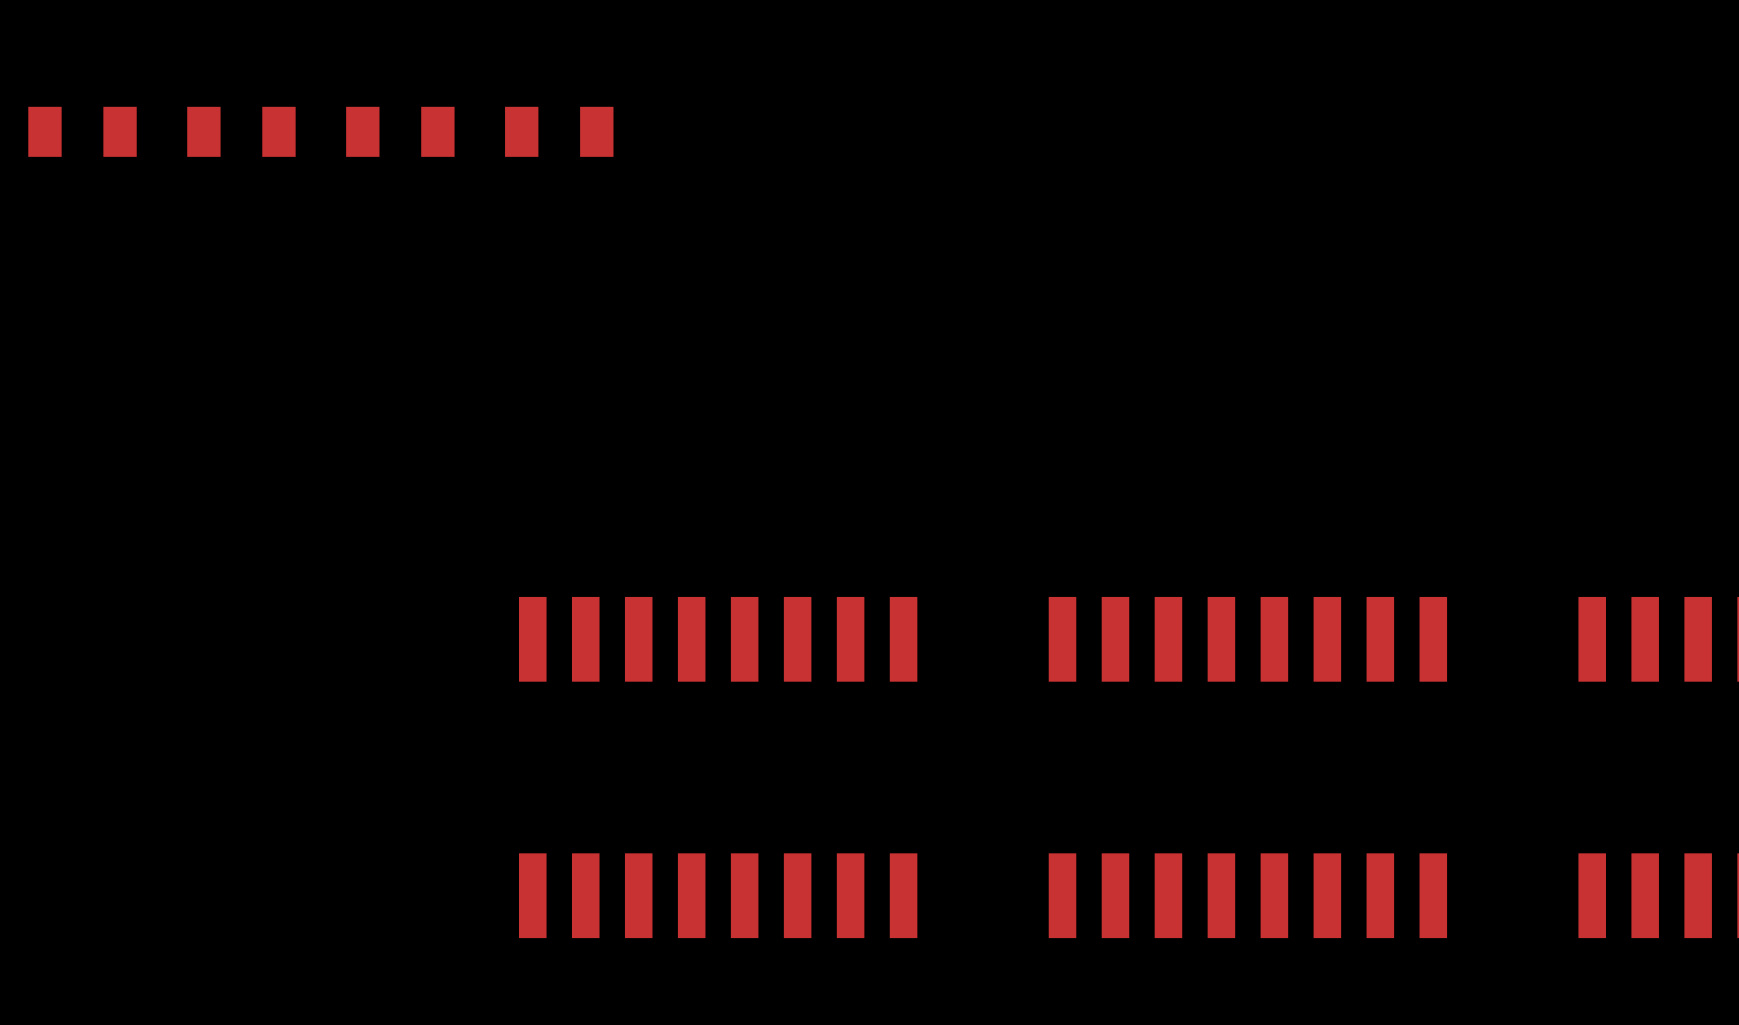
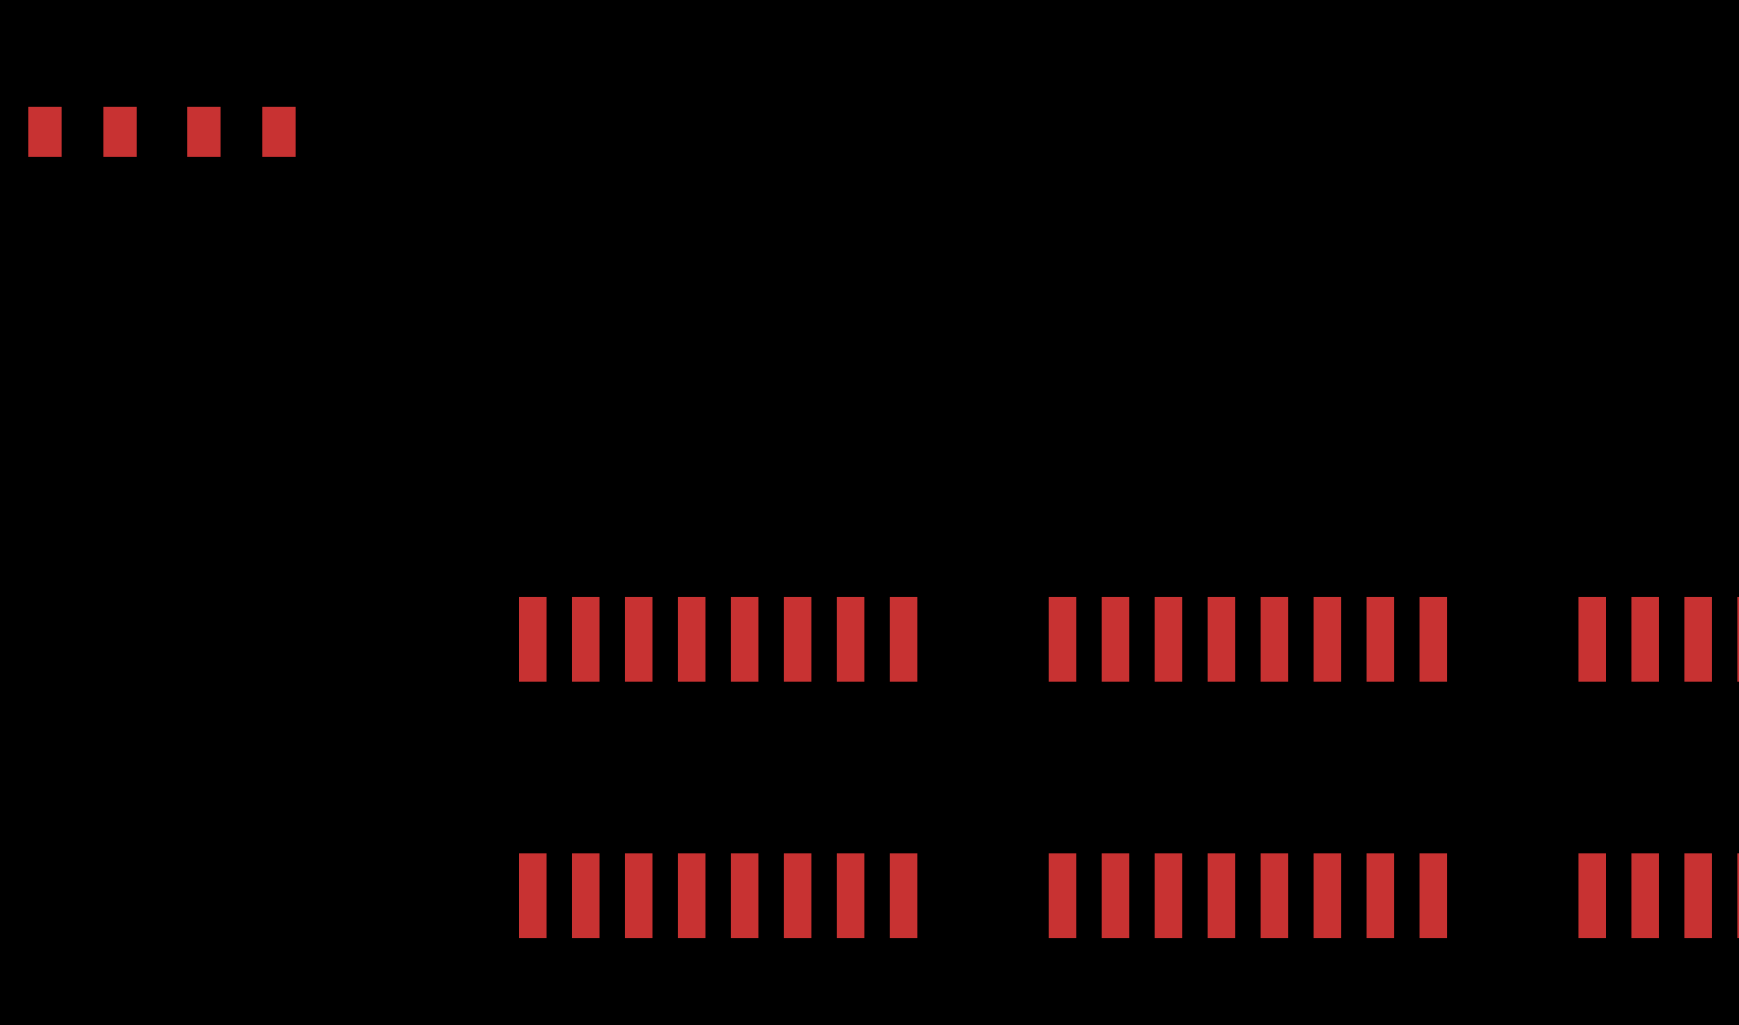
part: (400, 131) -> none
part: (559, 131) -> none

